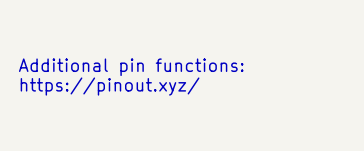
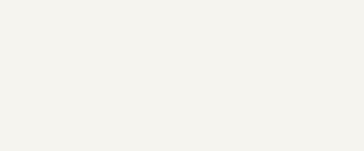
text: Additional pin functions: (131, 67) -> none
text: https://pinout.xyz/ (110, 86) -> none

